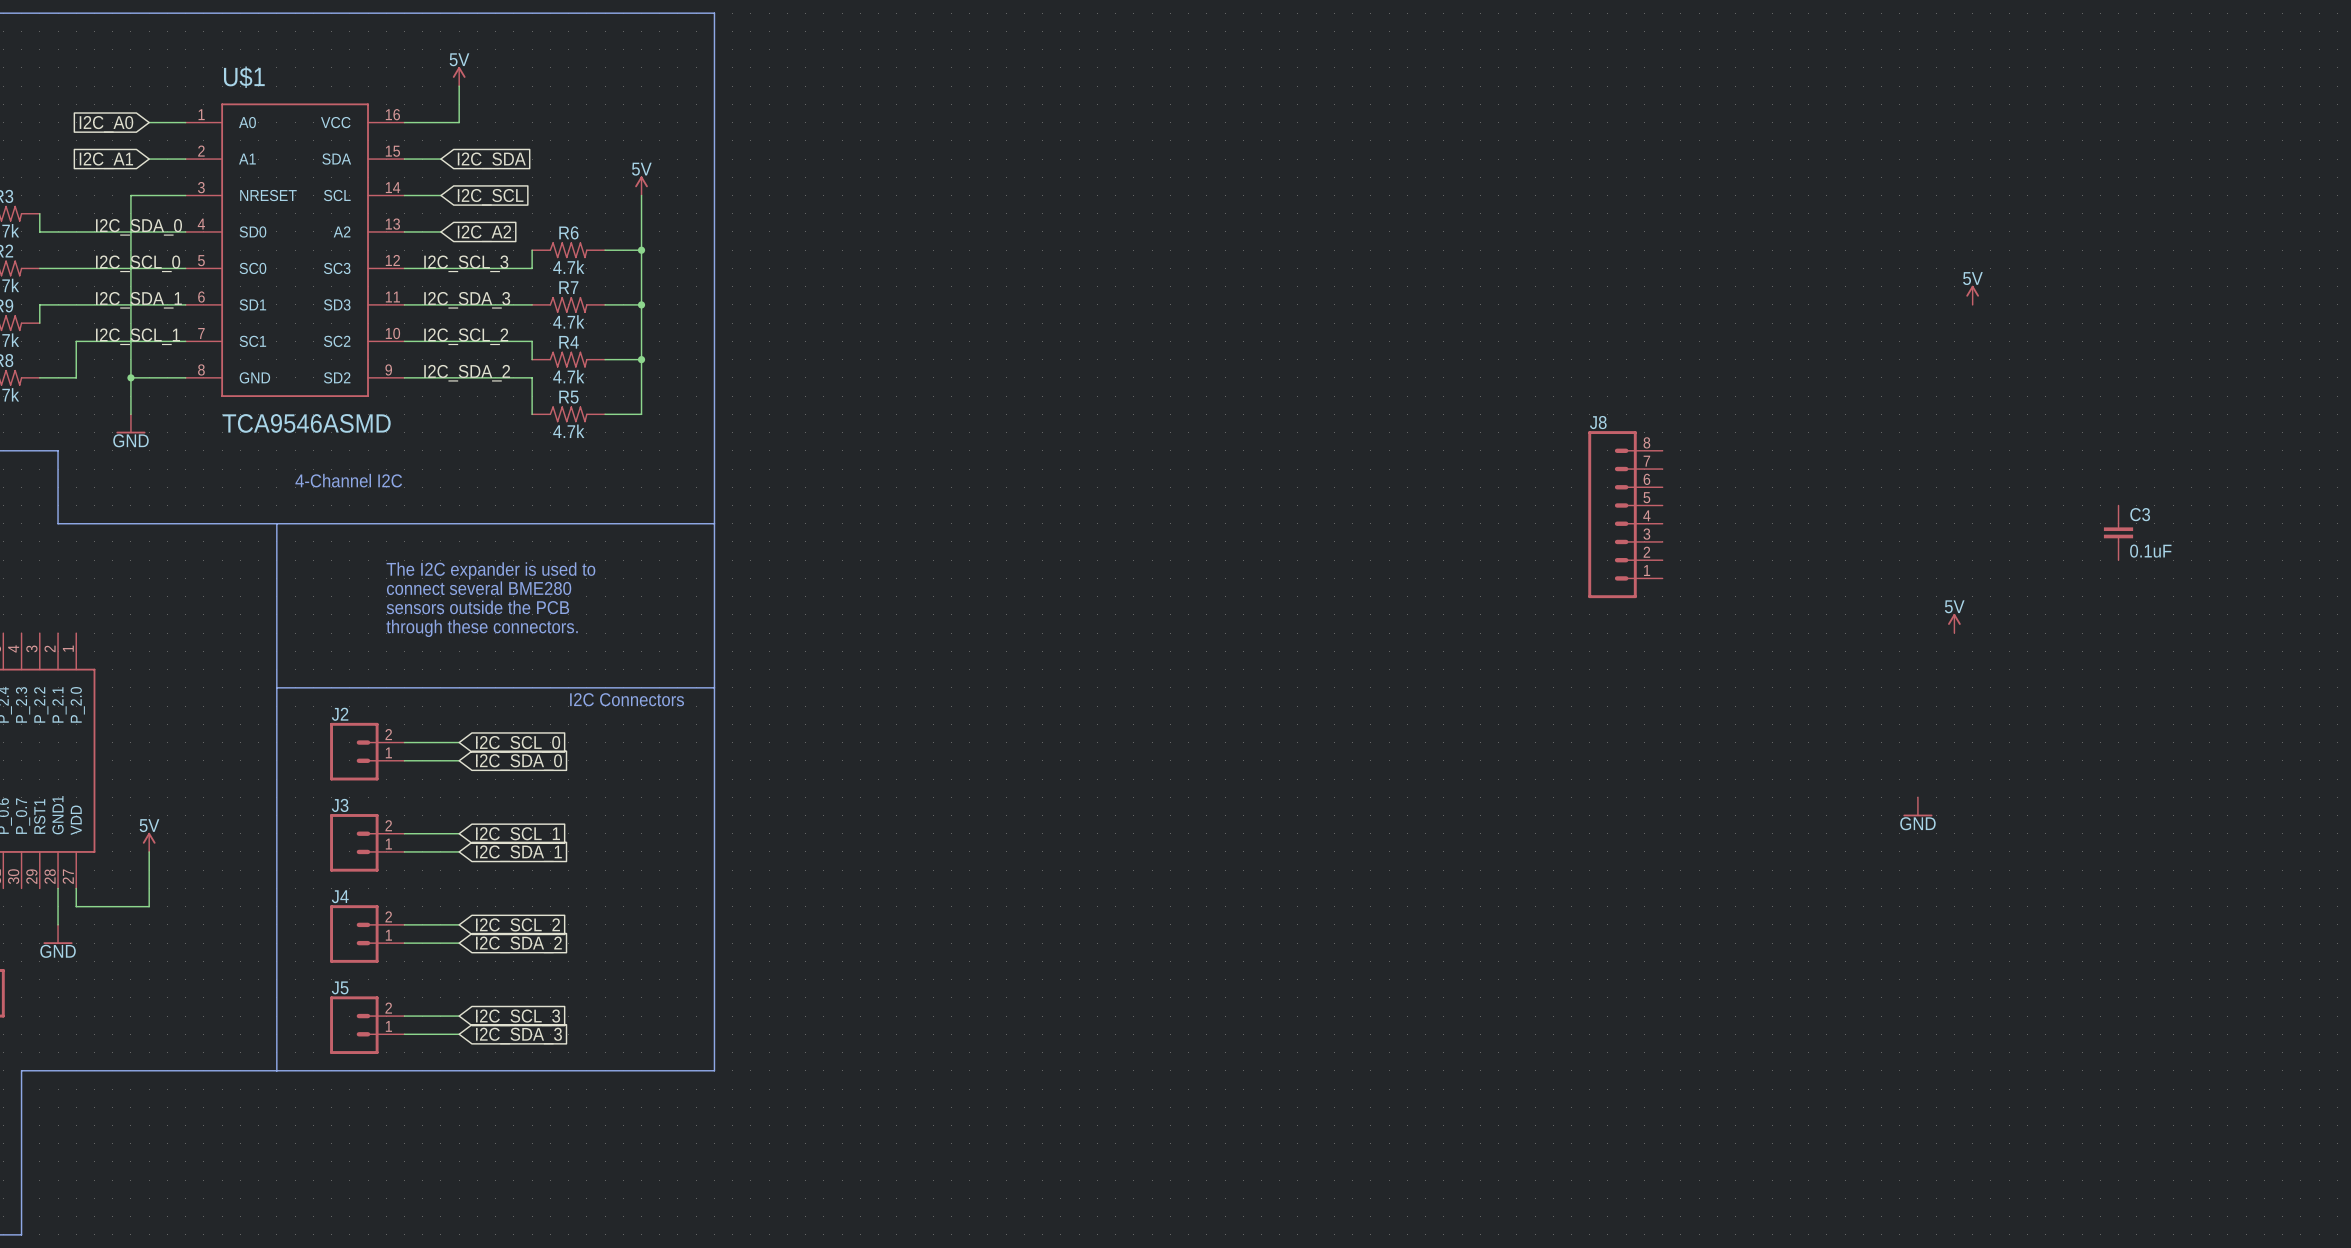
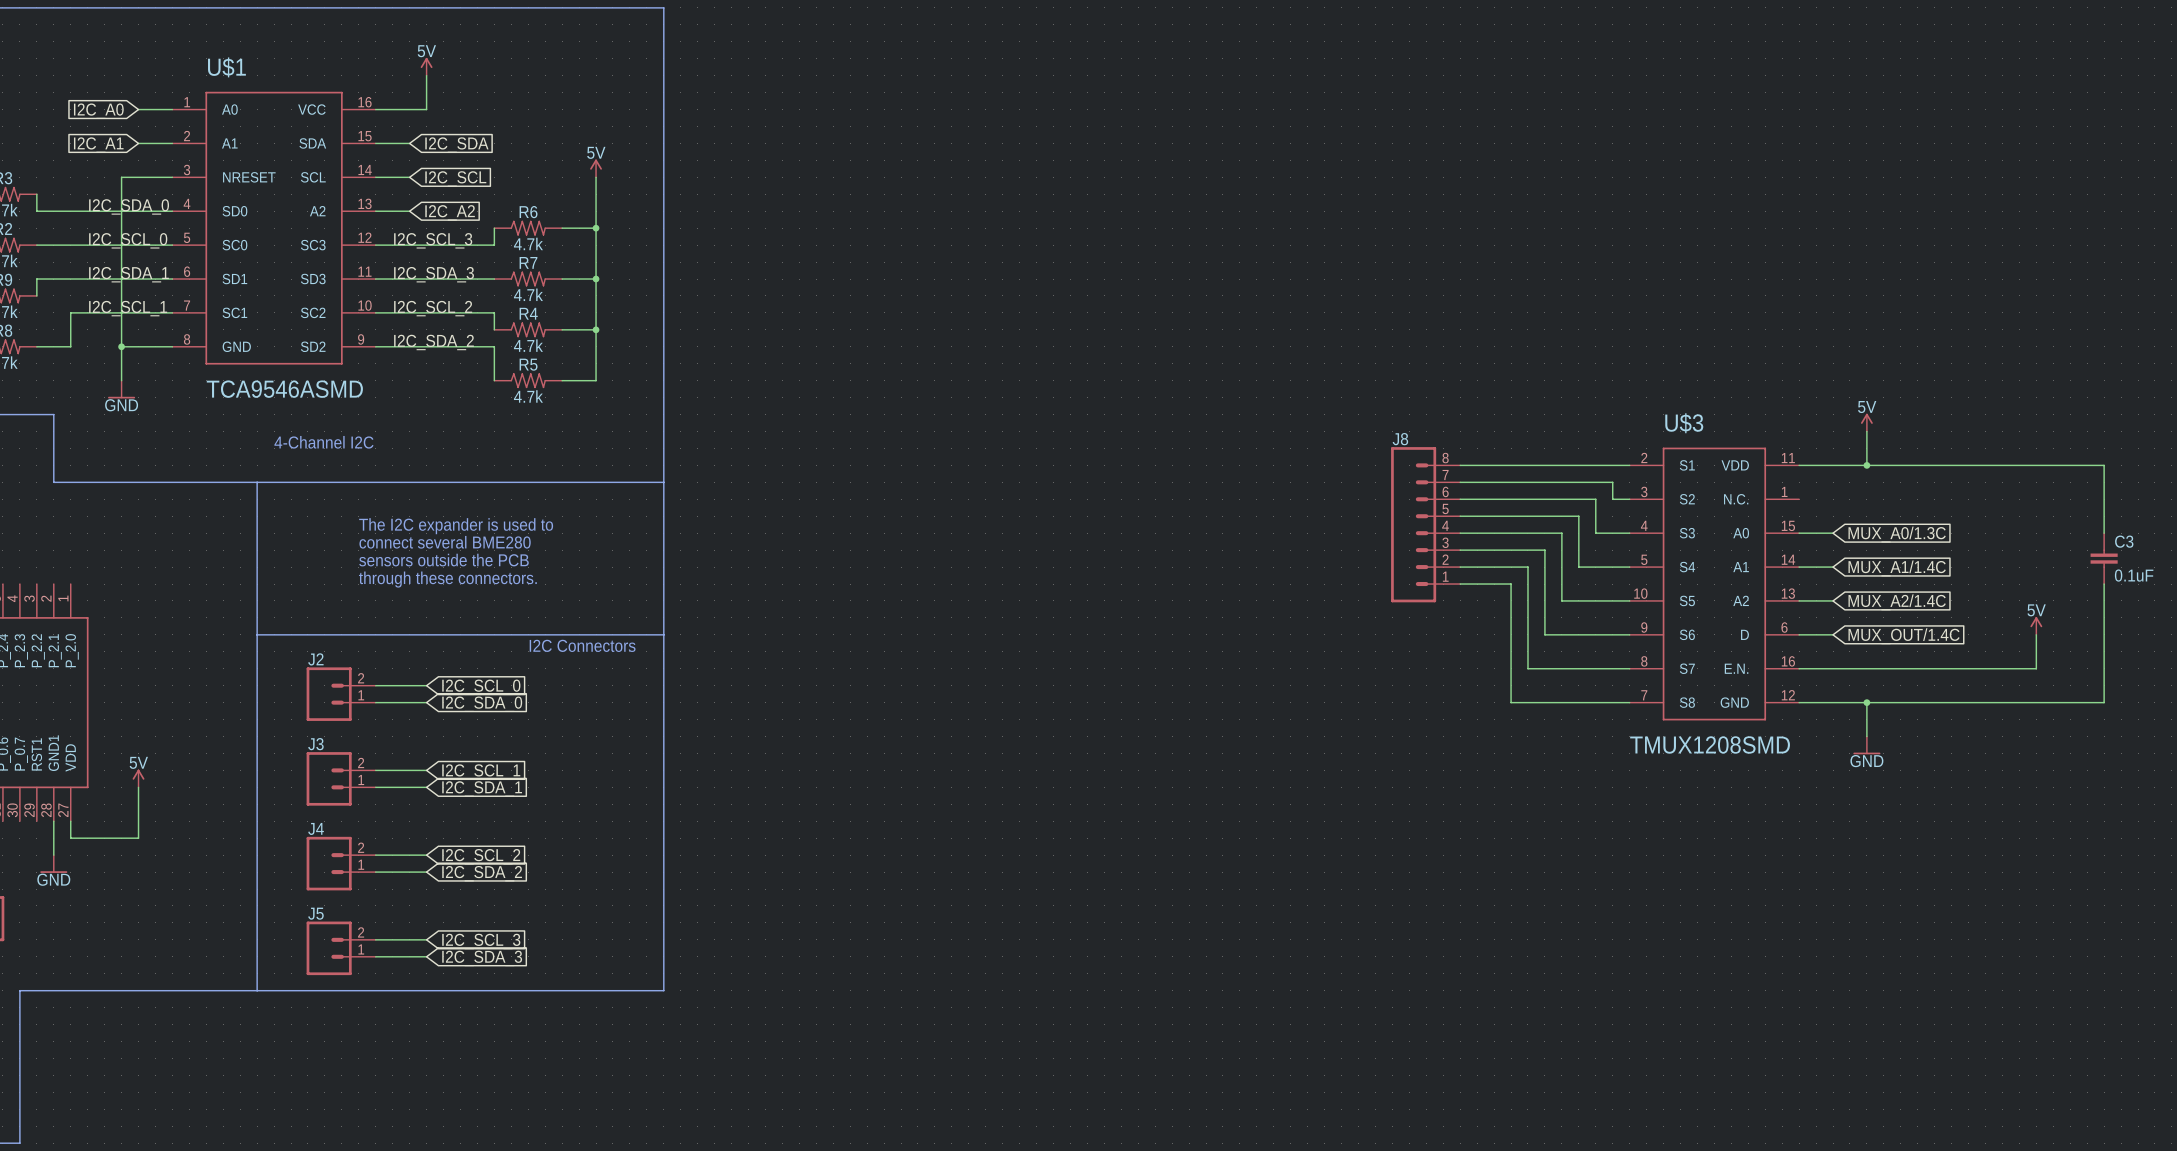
power symbol: 5V (1972, 295) -> none
power symbol: none -> 5V (1866, 422)
wire: none -> (1866, 431) (1866, 465)
wire: none -> (1460, 465) (1629, 465)
wire: none -> (1799, 465) (2104, 465) (2104, 533)
junction: none -> (1866, 465)
J8 position: (1625, 514) -> (1425, 524)
wire: none -> (1460, 482) (1612, 482) (1612, 499) (1629, 499)
C3 position: (2118, 532) -> (2104, 558)
wire: none -> (1460, 499) (1595, 499) (1595, 533) (1629, 533)
wire: none -> (1460, 516) (1578, 516) (1578, 567) (1629, 567)
wire: none -> (1460, 533) (1561, 533) (1561, 600) (1629, 600)
wire: none -> (1799, 533) (1833, 533)
global label: none -> MUX_A0/1.3C (1897, 534)
wire: none -> (1460, 550) (1544, 550) (1544, 634) (1629, 634)
wire: none -> (1460, 567) (1527, 567) (1527, 668) (1629, 668)
wire: none -> (1799, 567) (1833, 567)
global label: none -> MUX_A1/1.4C (1897, 568)
power symbol: 5V (1954, 623) -> none
wire: none -> (1460, 584) (1511, 584) (1511, 702) (1629, 702)
U$3: none -> TMUX1208SMD (1714, 584)
wire: none -> (2104, 584) (2104, 702) (1799, 702)
wire: none -> (1799, 600) (1833, 600)
global label: none -> MUX_A2/1.4C (1897, 602)
power symbol: none -> 5V (2036, 625)
wire: none -> (1799, 634) (1833, 634)
wire: none -> (2036, 634) (2036, 668) (1799, 668)
global label: none -> MUX_OUT/1.4C (1904, 636)
wire: none -> (1866, 702) (1866, 736)
junction: none -> (1866, 702)
power symbol position: GND (1917, 806) -> GND (1866, 745)

